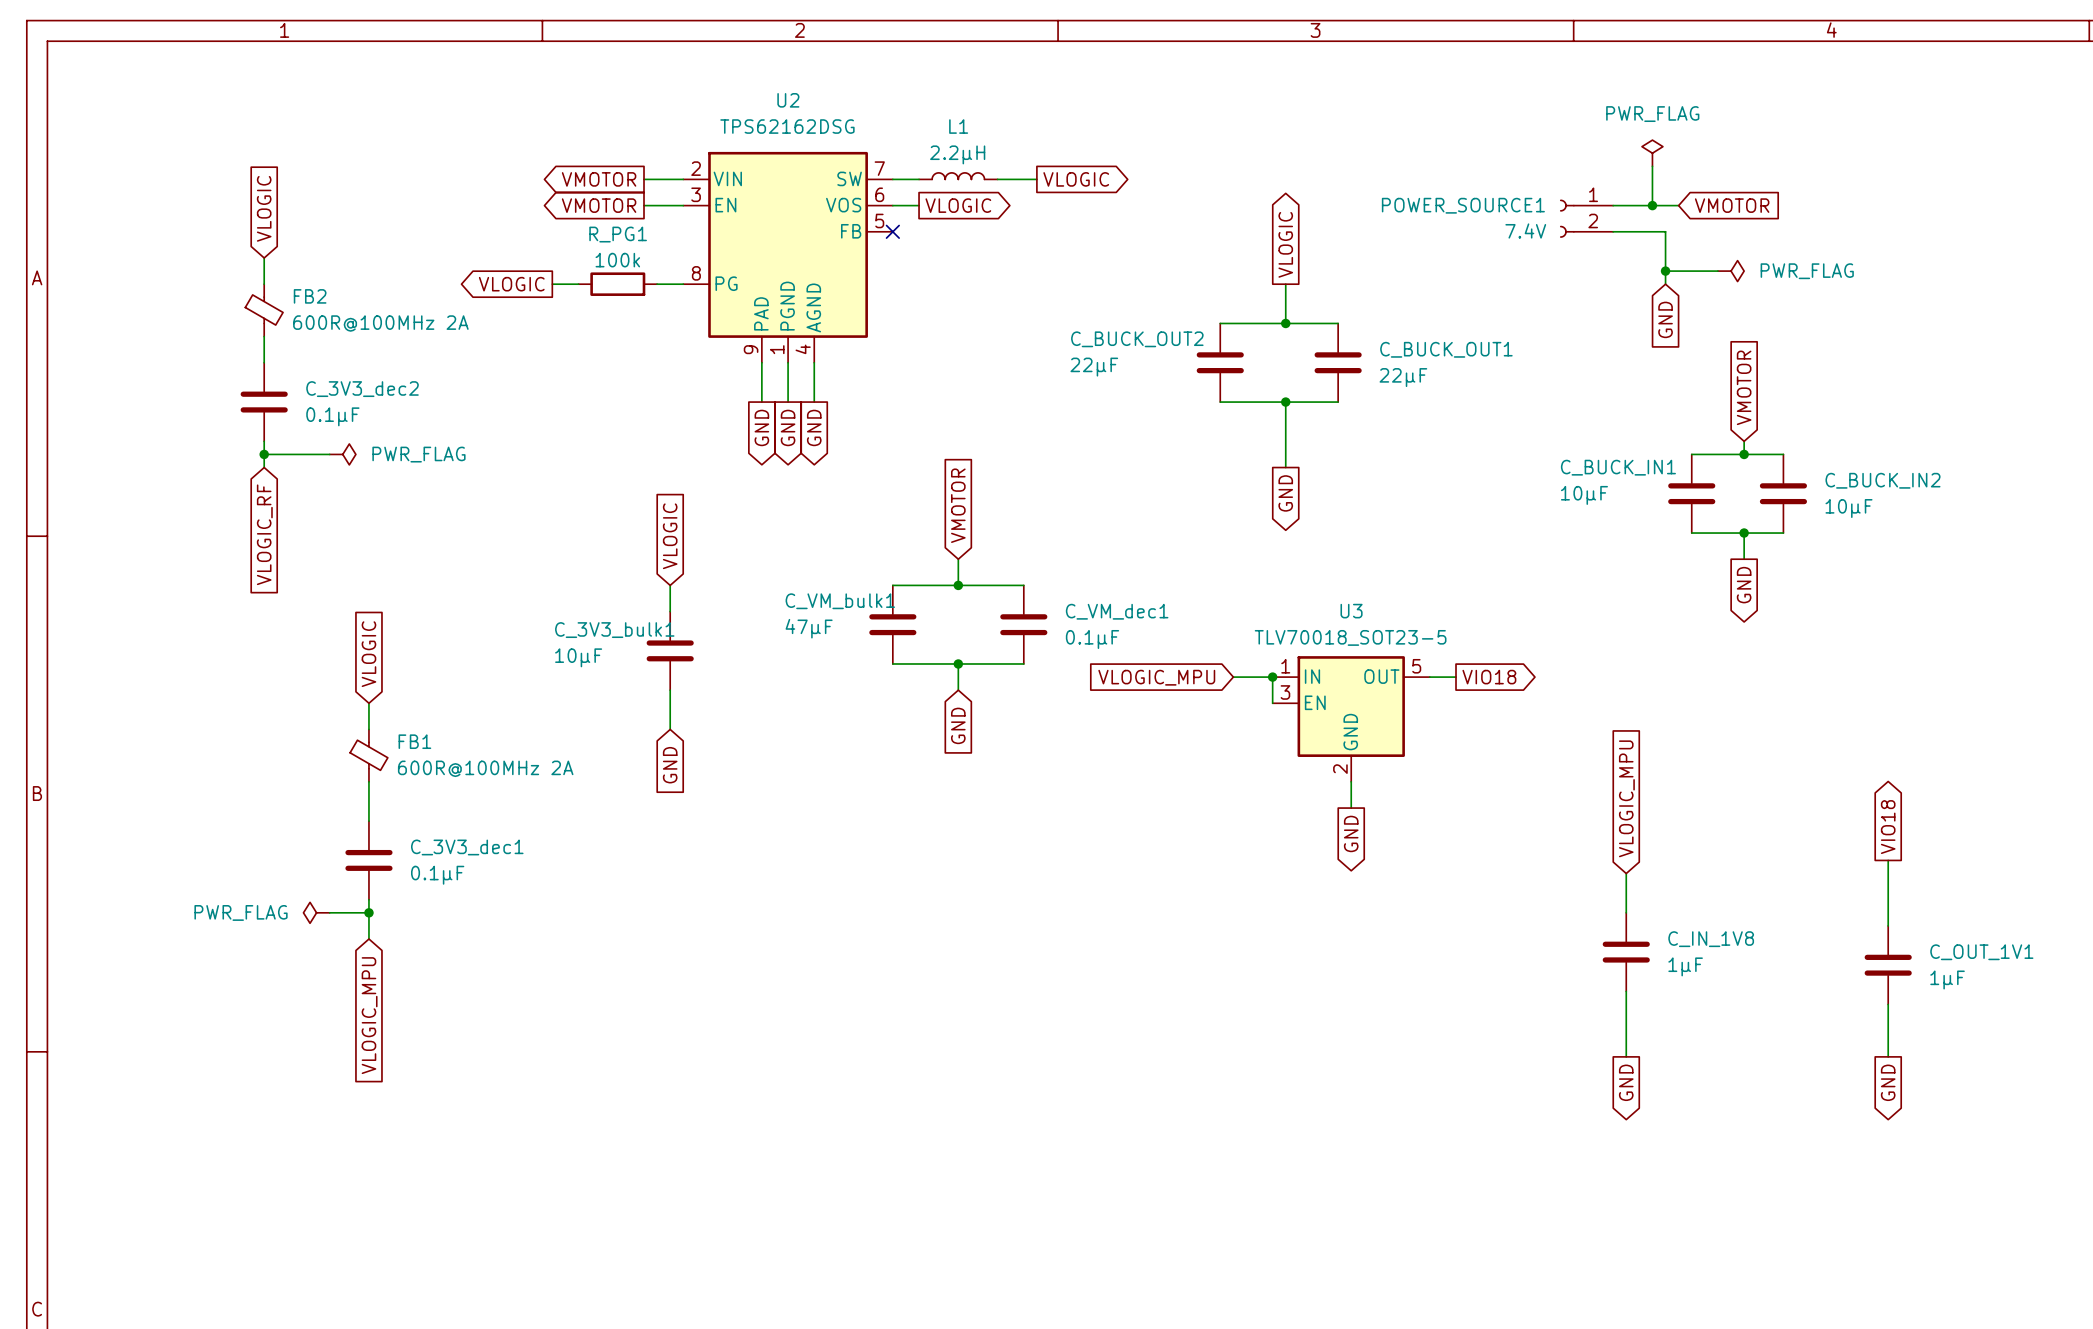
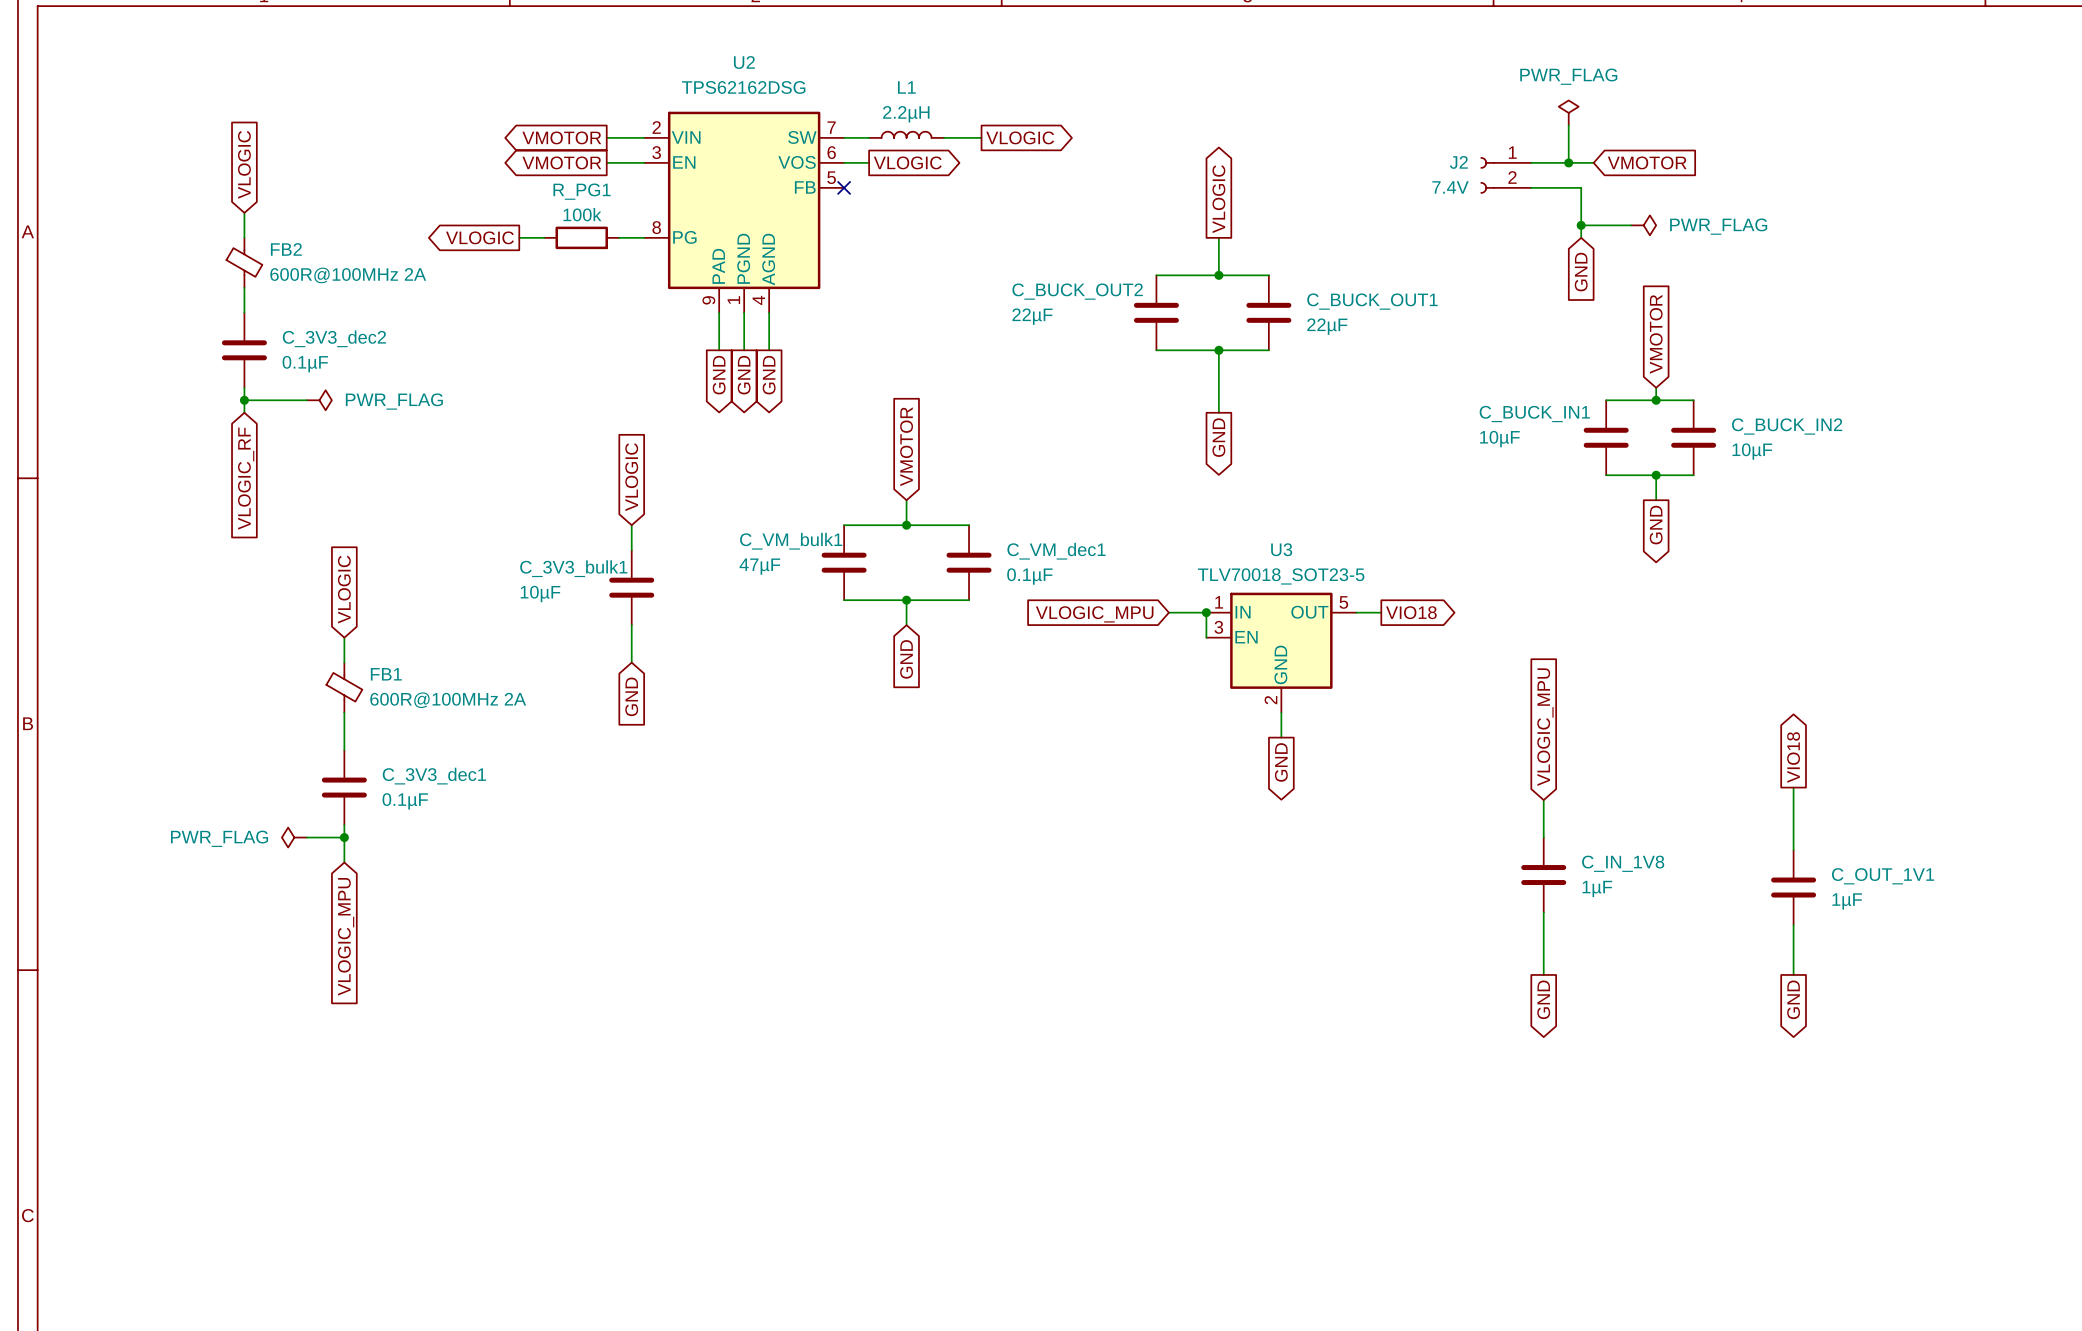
POWER_SOURCE1 name: POWER_SOURCE1 (1463, 205) -> J2 (1458, 162)

